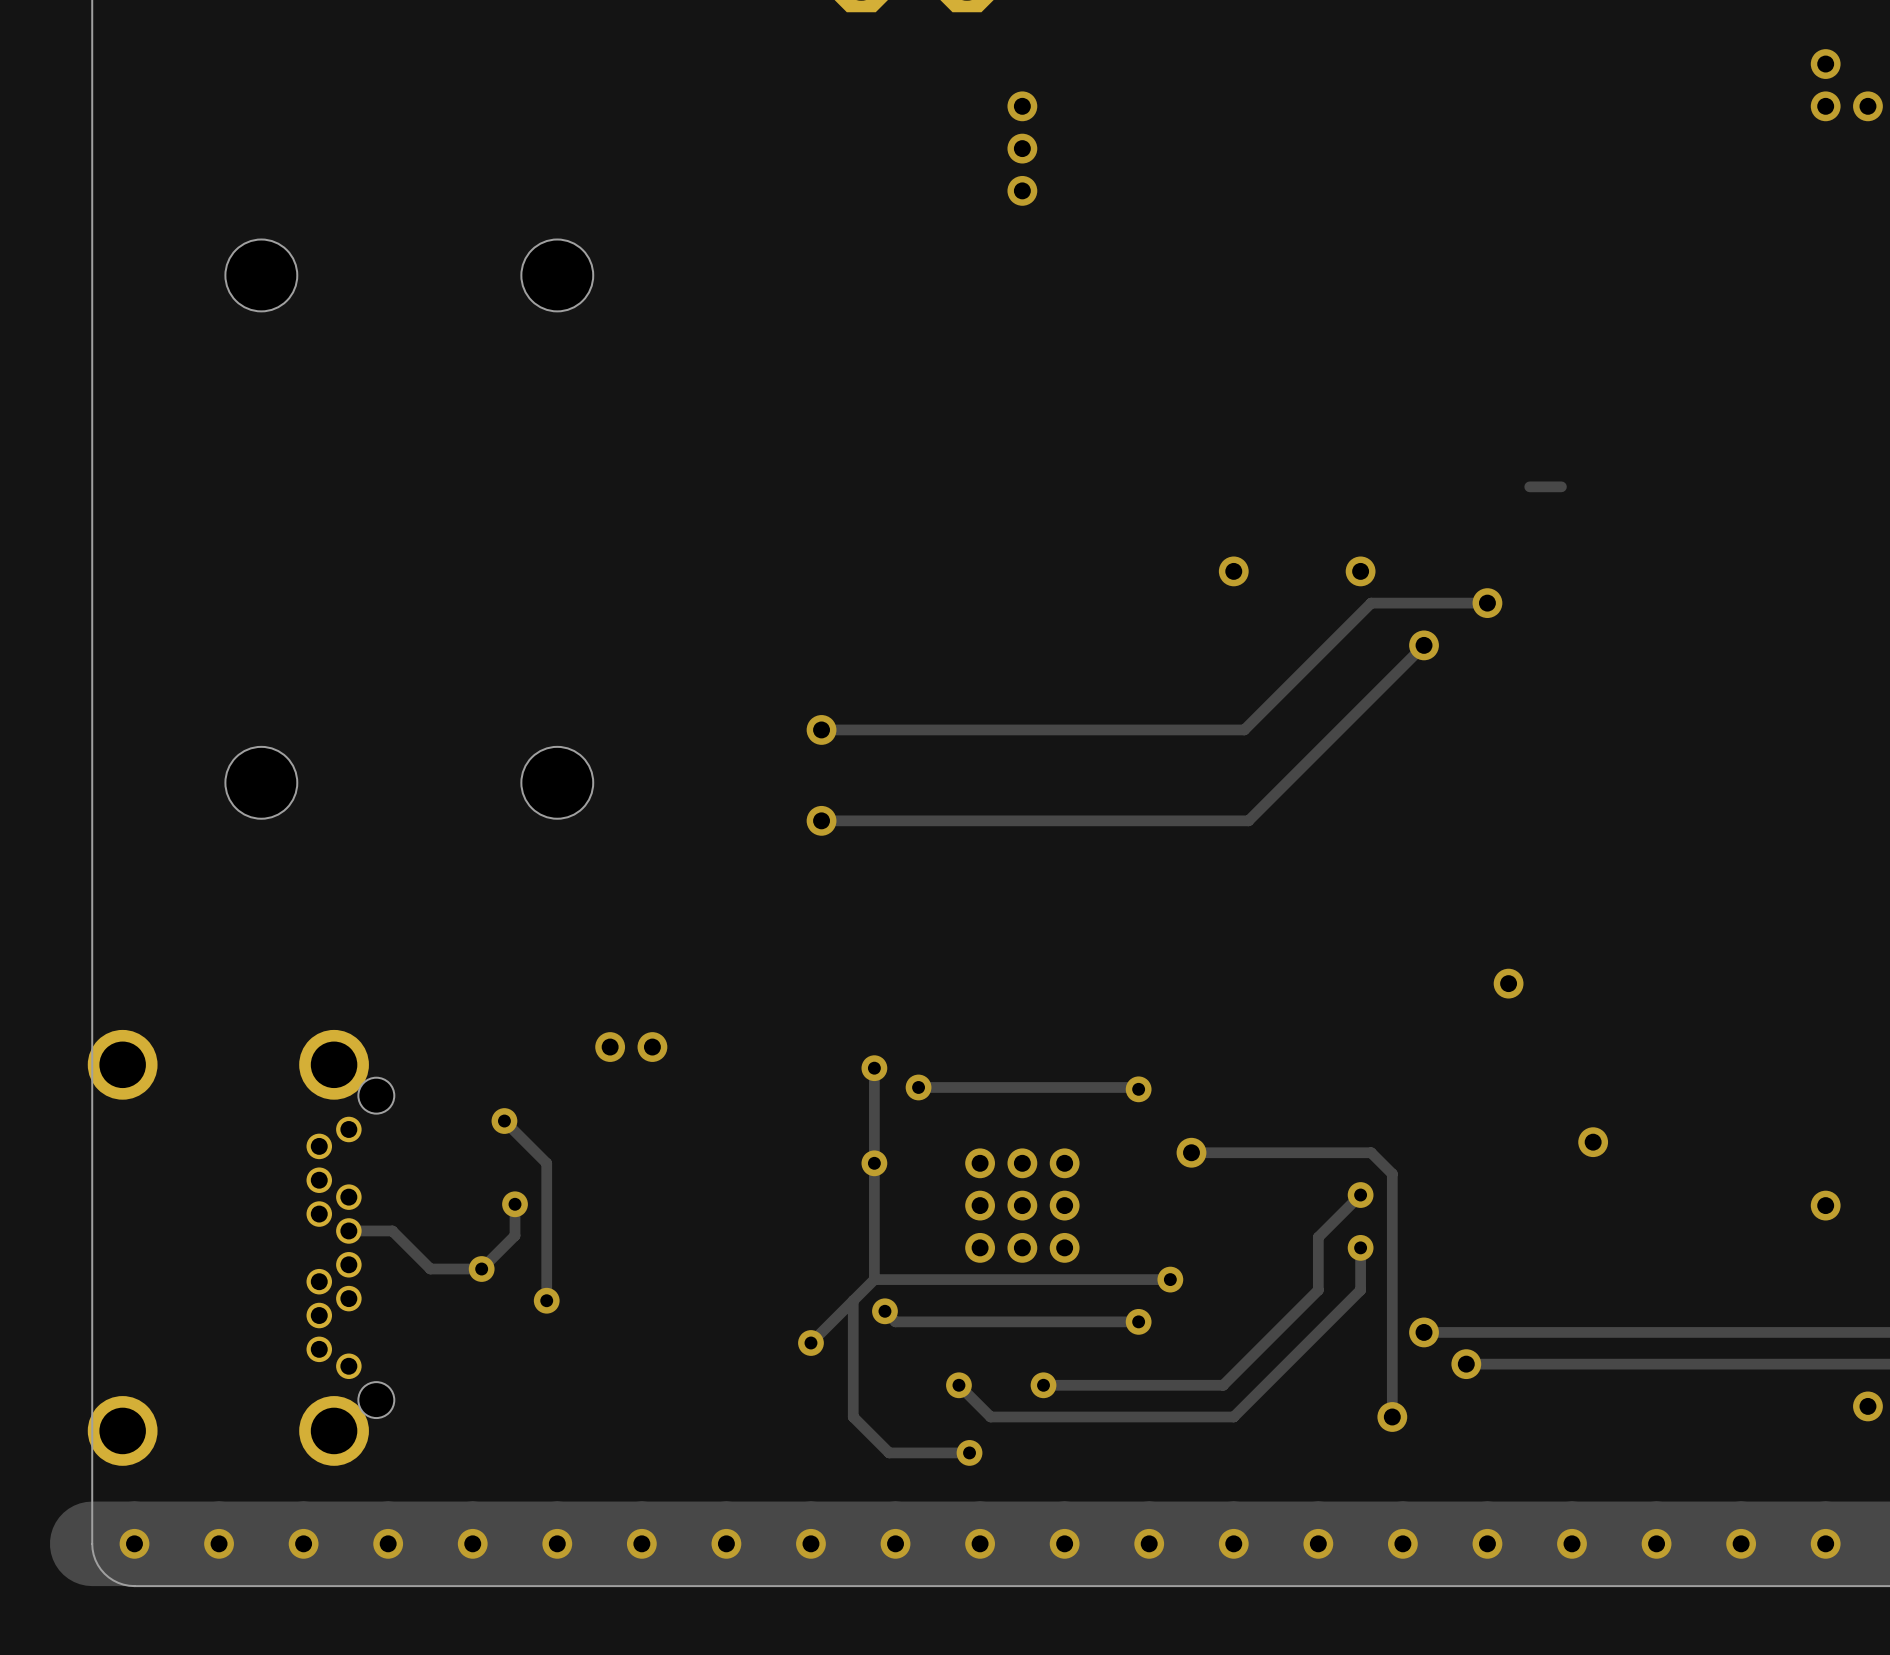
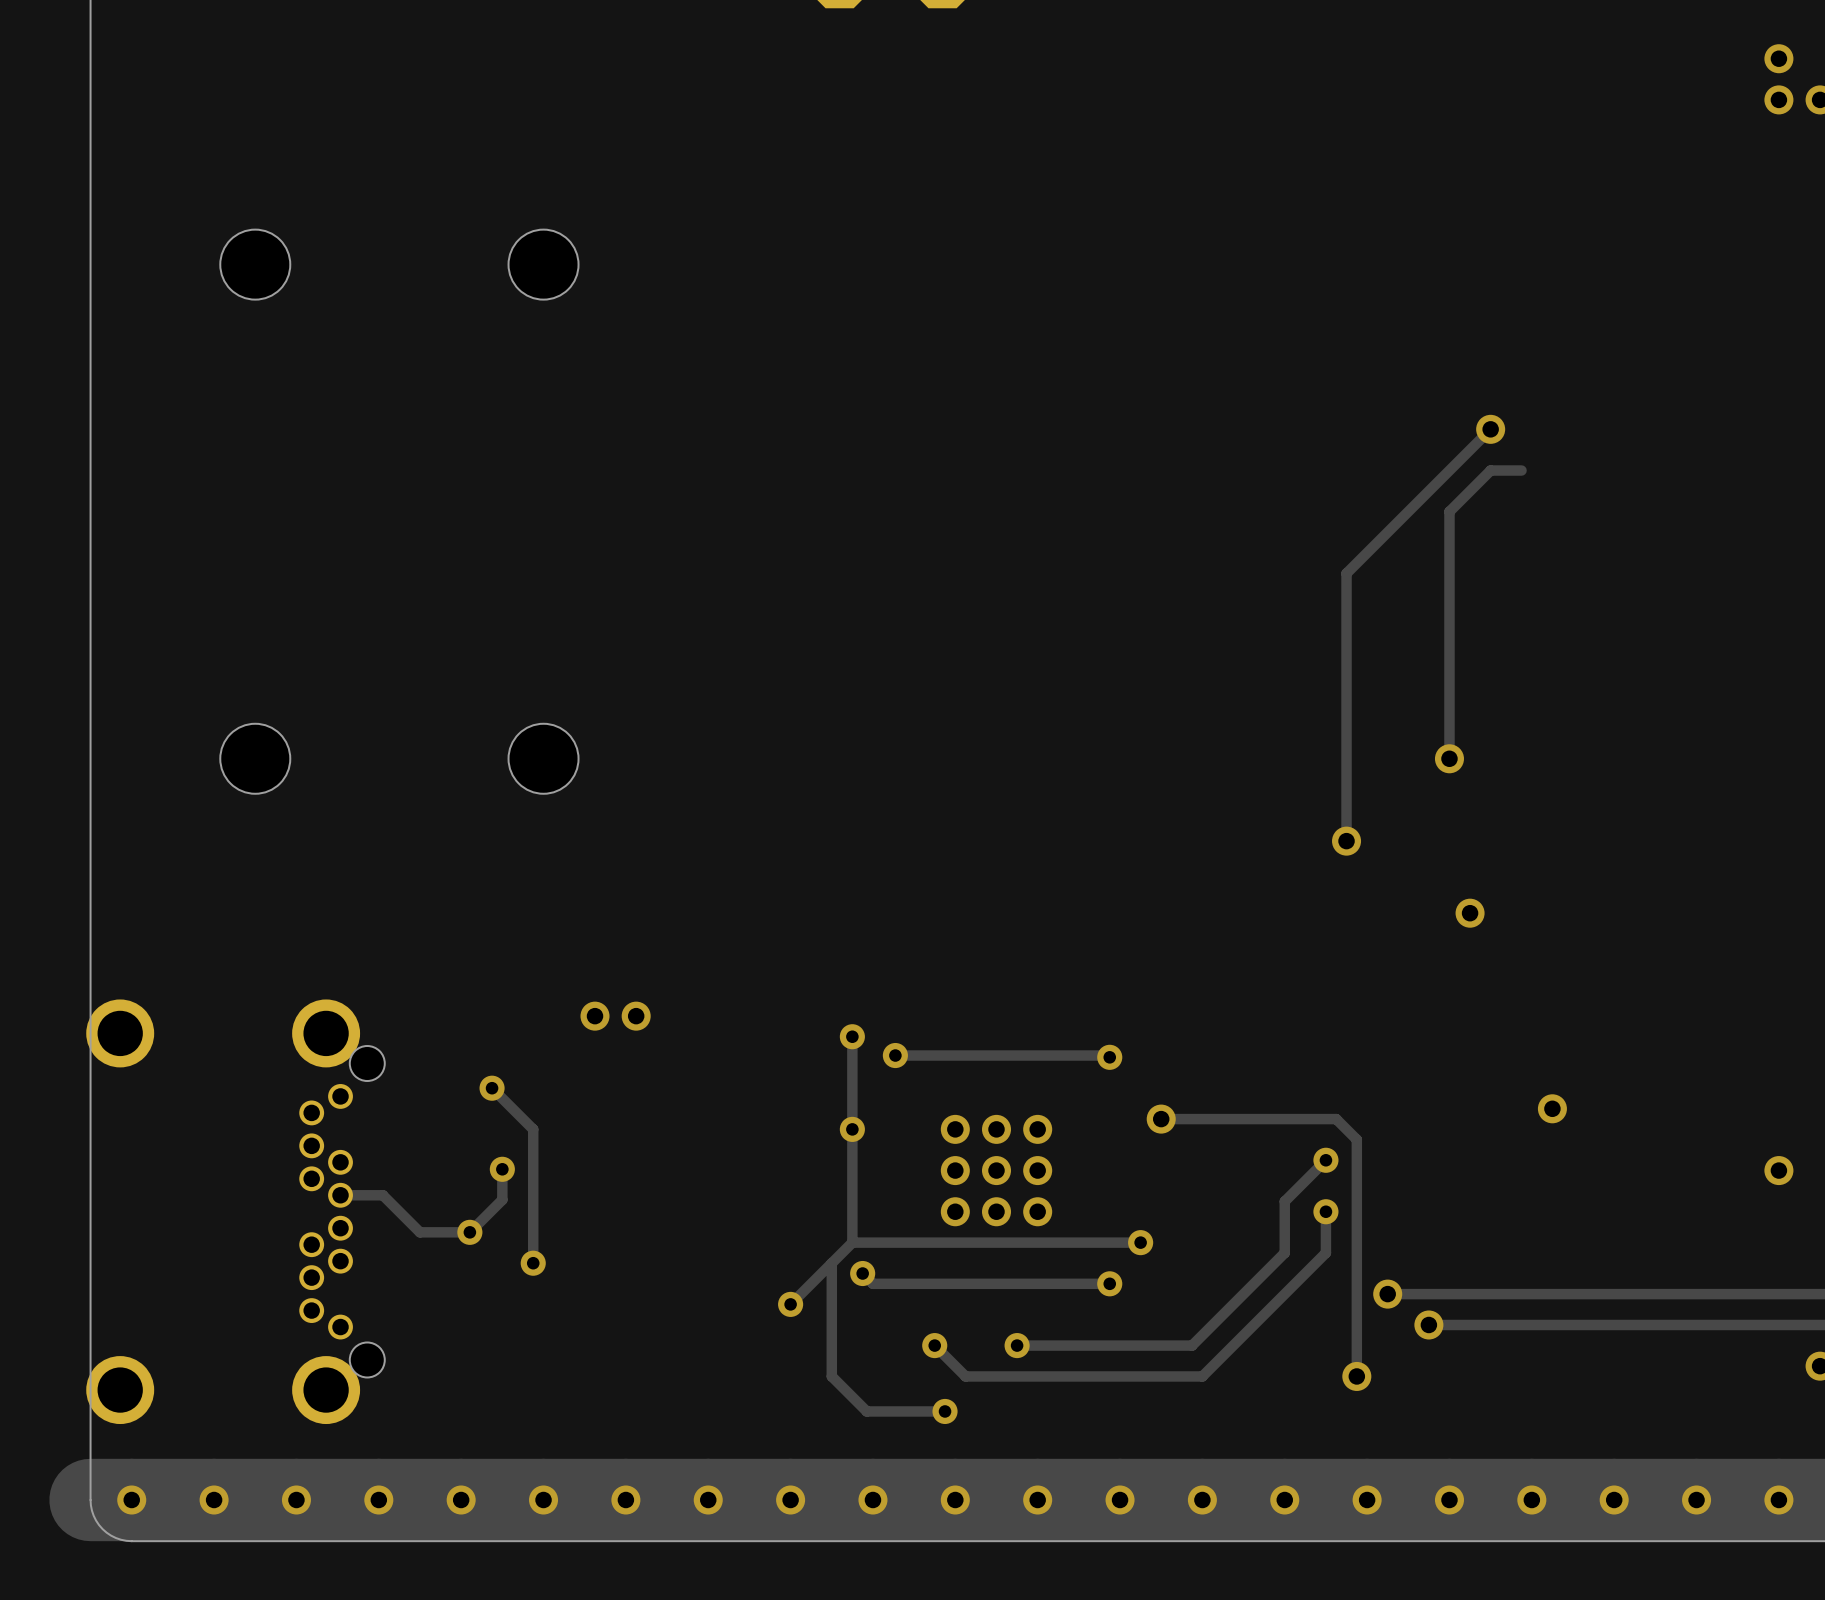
via: (1022, 106) -> none
via: (1022, 148) -> none
via: (1022, 190) -> none
track: none -> (1490, 429) (1346, 573) (1346, 841)
via: none -> (1490, 429)
track: none -> (1490, 470) (1449, 511) (1449, 758)
via: (1233, 571) -> none
via: (1360, 571) -> none
track: (1487, 603) (1371, 603) (1244, 729) (821, 729) -> none
via: (1487, 603) -> none
track: (1424, 645) (1248, 820) (821, 820) -> none
via: (1424, 645) -> none
via: (821, 729) -> none
via: none -> (1449, 758)
via: (821, 820) -> none
via: none -> (1346, 841)
via position: (1508, 983) -> (1470, 913)

